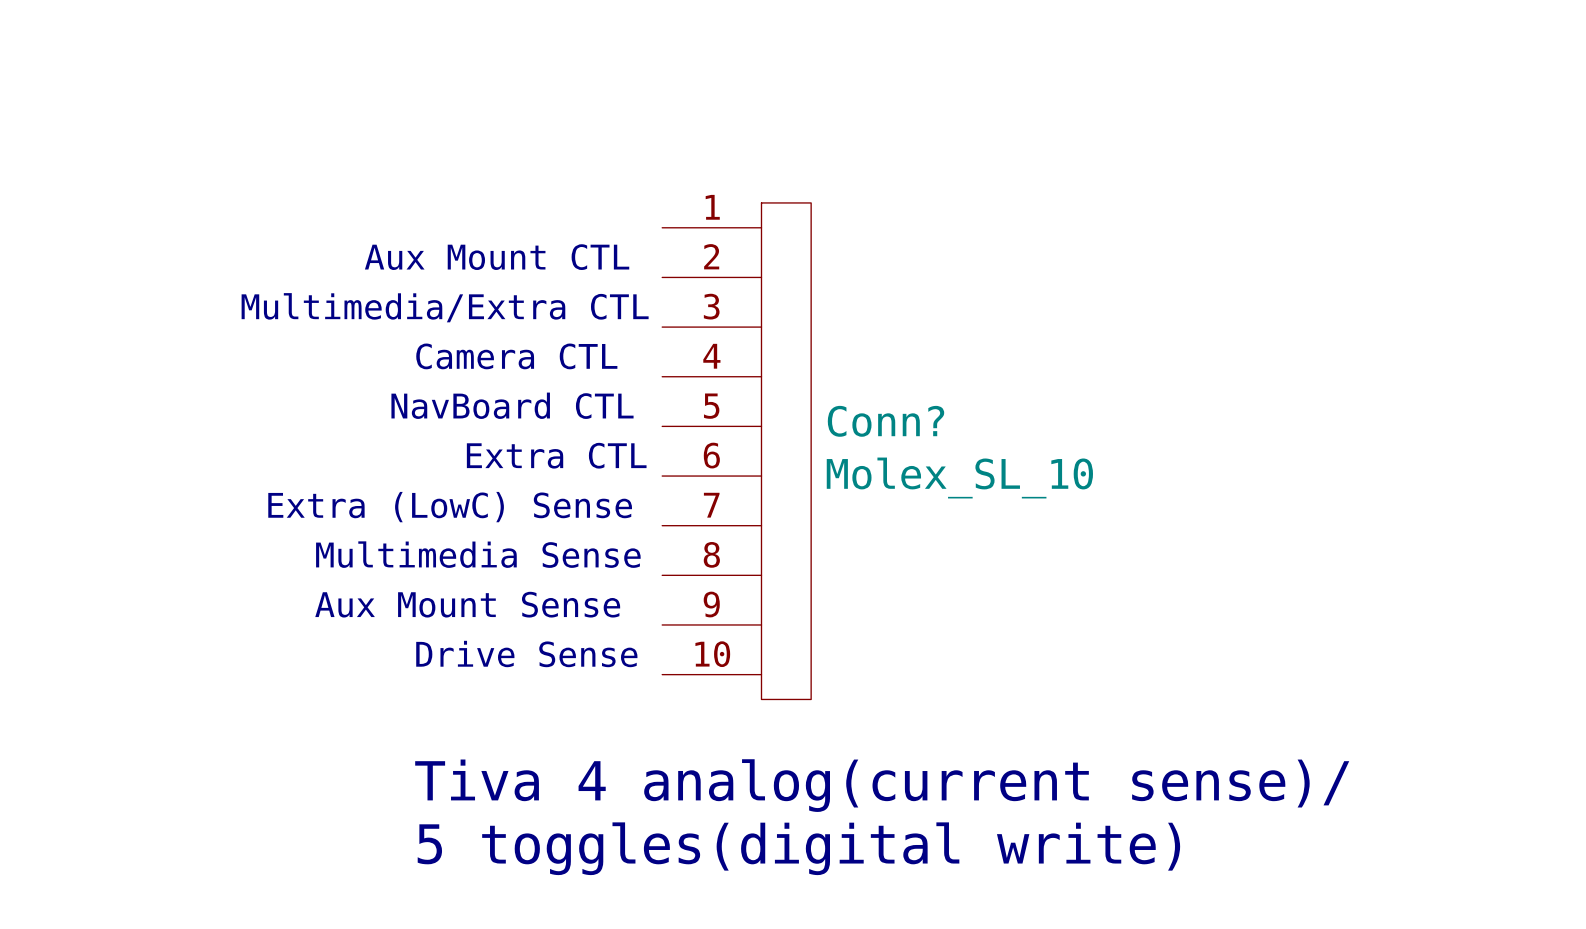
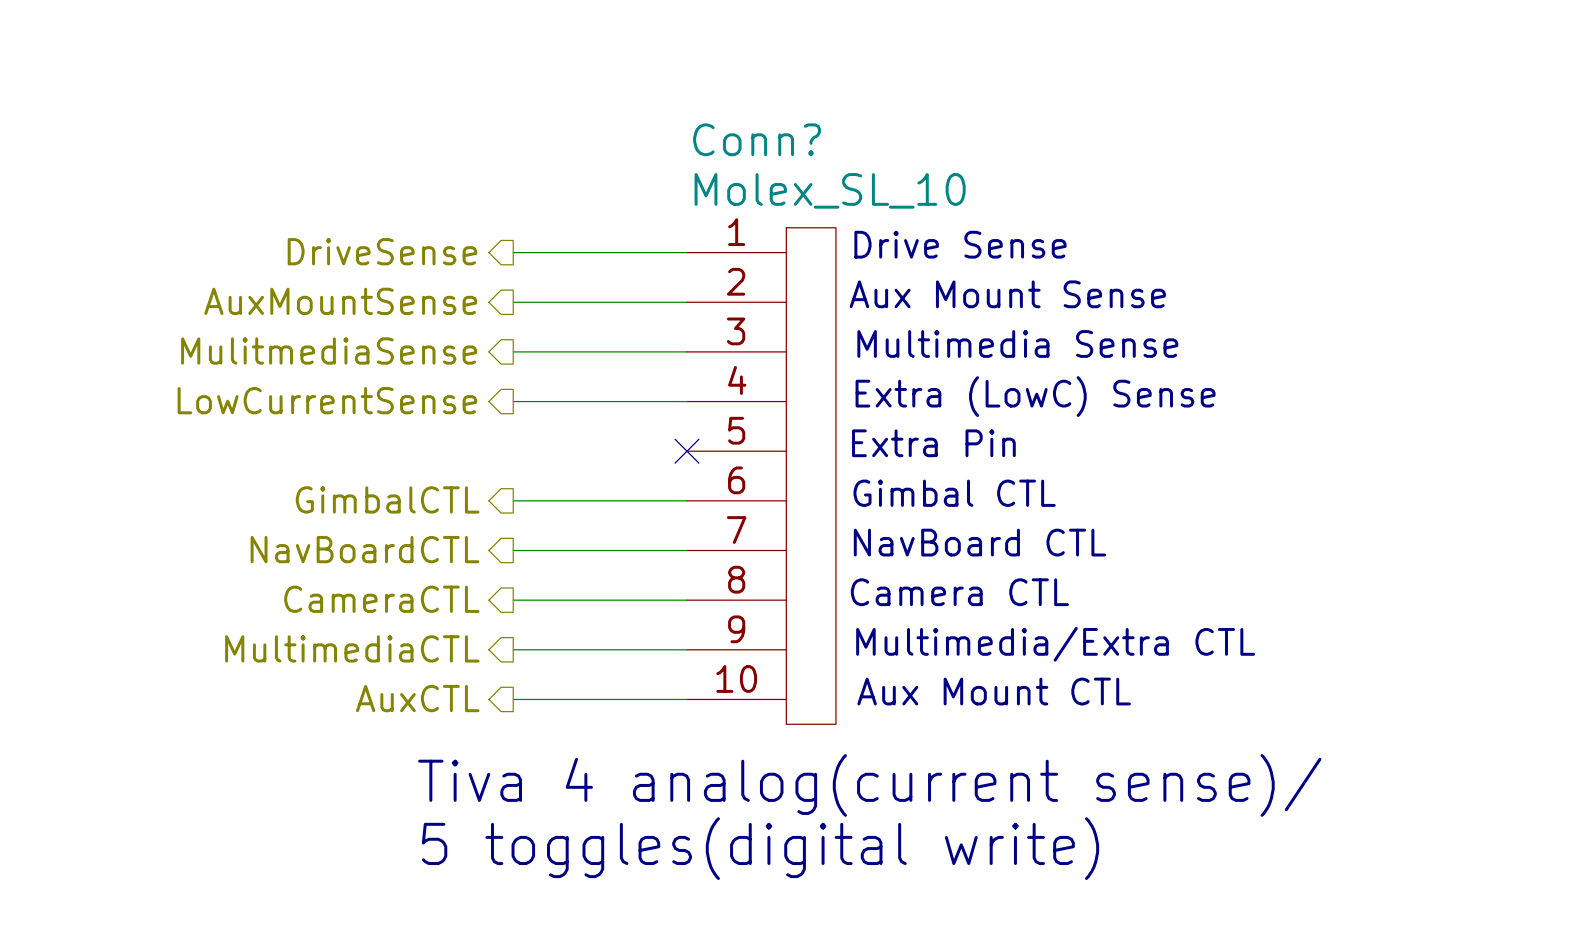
text: none -> Drive Sense (960, 244)
hierarchical label: none -> DriveSense (382, 251)
wire: none -> (513, 252) (687, 252)
text: Aux Mount CTL (497, 257) -> none
text: none -> Aux Mount Sense (1007, 294)
hierarchical label: none -> AuxMountSense (340, 301)
wire: none -> (513, 302) (687, 302)
text: Multimedia/Extra CTL (445, 307) -> none
text: none -> Multimedia Sense (1017, 343)
hierarchical label: none -> MulitmediaSense (329, 351)
wire: none -> (513, 351) (687, 351)
text: Camera CTL (516, 356) -> none
text: none -> Extra (LowC) Sense (1035, 396)
hierarchical label: none -> LowCurrentSense (327, 400)
wire: none -> (513, 401) (687, 401)
text: NavBoard CTL (512, 405) -> none
Conn? name position: Conn? (886, 421) -> Conn? (757, 139)
text: none -> Extra Pin (933, 443)
no-connect mark: none -> (687, 451)
Conn? position: (736, 451) -> (761, 476)
text: Extra CTL (556, 455) -> none
Conn? value position: Molex_SL_10 (959, 478) -> Molex_SL_10 (830, 190)
text: none -> Gimbal CTL (954, 493)
hierarchical label: none -> GimbalCTL (387, 499)
wire: none -> (513, 500) (687, 500)
text: Extra (LowC) Sense (450, 507) -> none
text: none -> NavBoard CTL (980, 542)
hierarchical label: none -> NavBoardCTL (365, 549)
wire: none -> (513, 550) (687, 550)
text: Multimedia Sense (478, 554) -> none
text: none -> Camera CTL (959, 592)
hierarchical label: none -> CameraCTL (381, 599)
wire: none -> (513, 600) (687, 600)
text: Aux Mount Sense (467, 604) -> none
text: none -> Multimedia/Extra CTL (1055, 644)
hierarchical label: none -> MultimediaCTL (352, 648)
wire: none -> (513, 649) (687, 649)
text: Drive Sense (526, 654) -> none
text: none -> Aux Mount CTL (994, 691)
hierarchical label: none -> AuxCTL (417, 698)
wire: none -> (513, 699) (687, 699)

